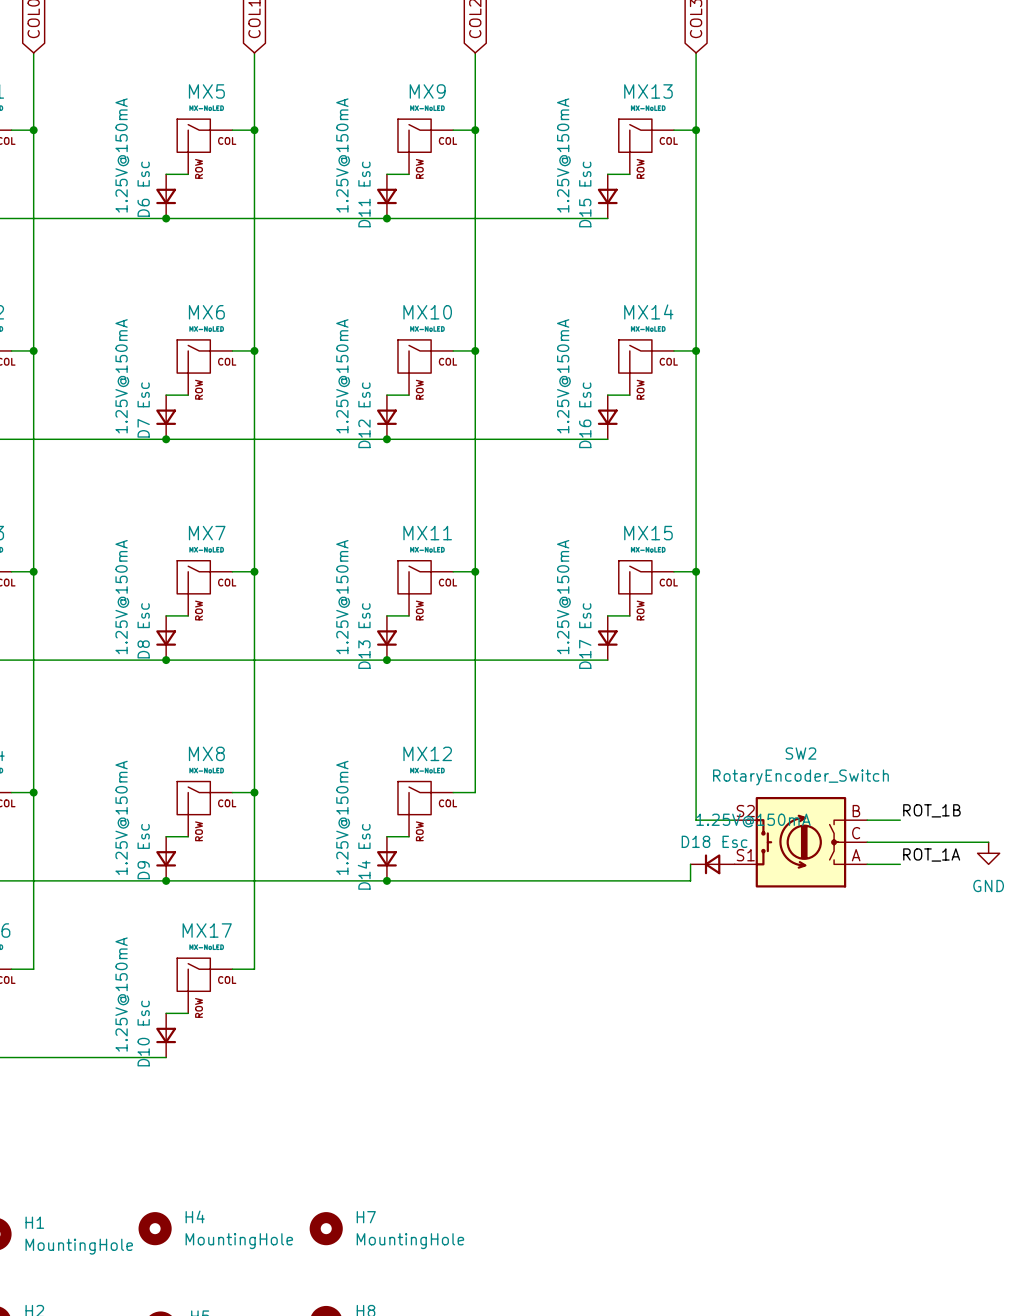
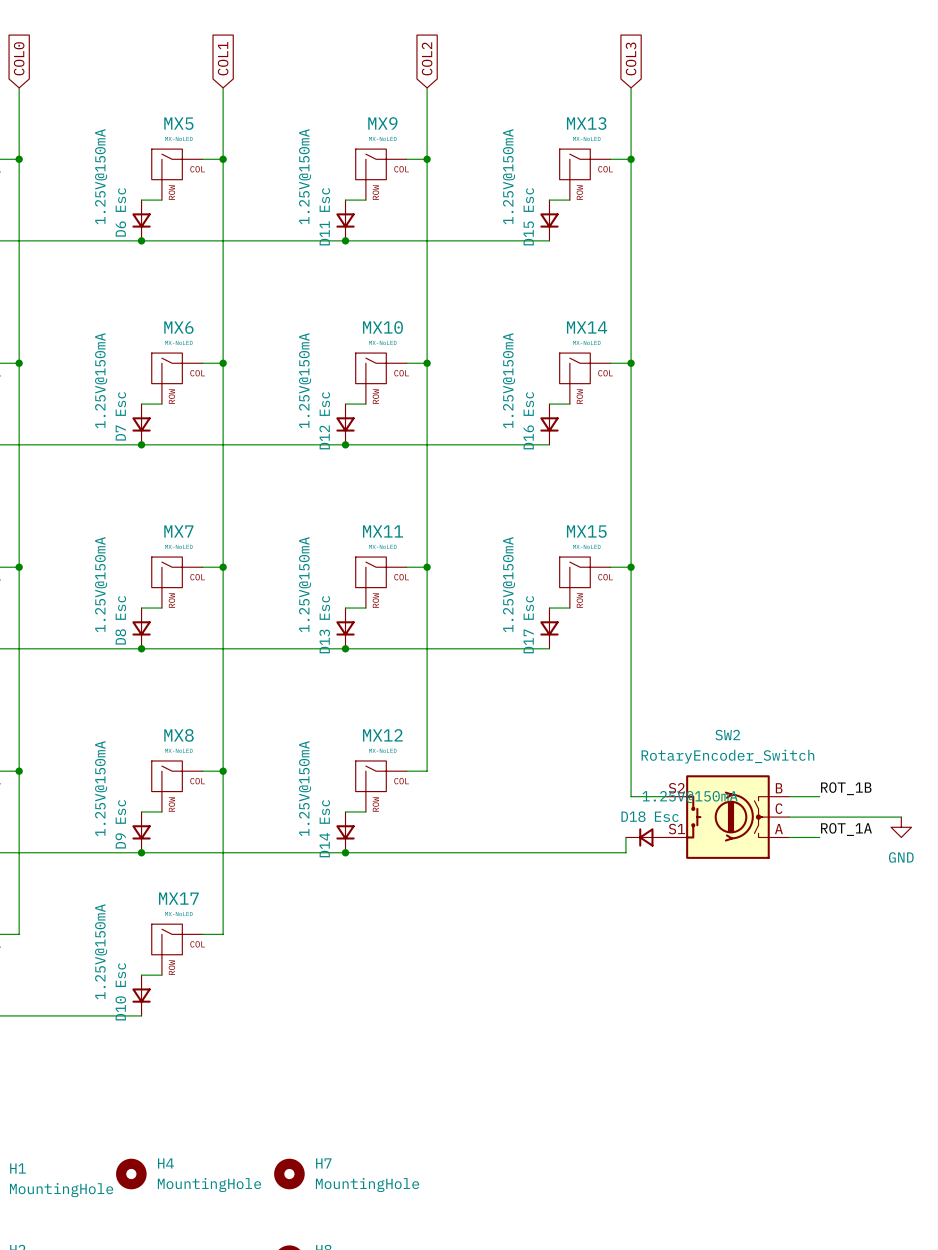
SW2 symbol: [734, 796, 868, 888] -> [666, 775, 790, 859]

